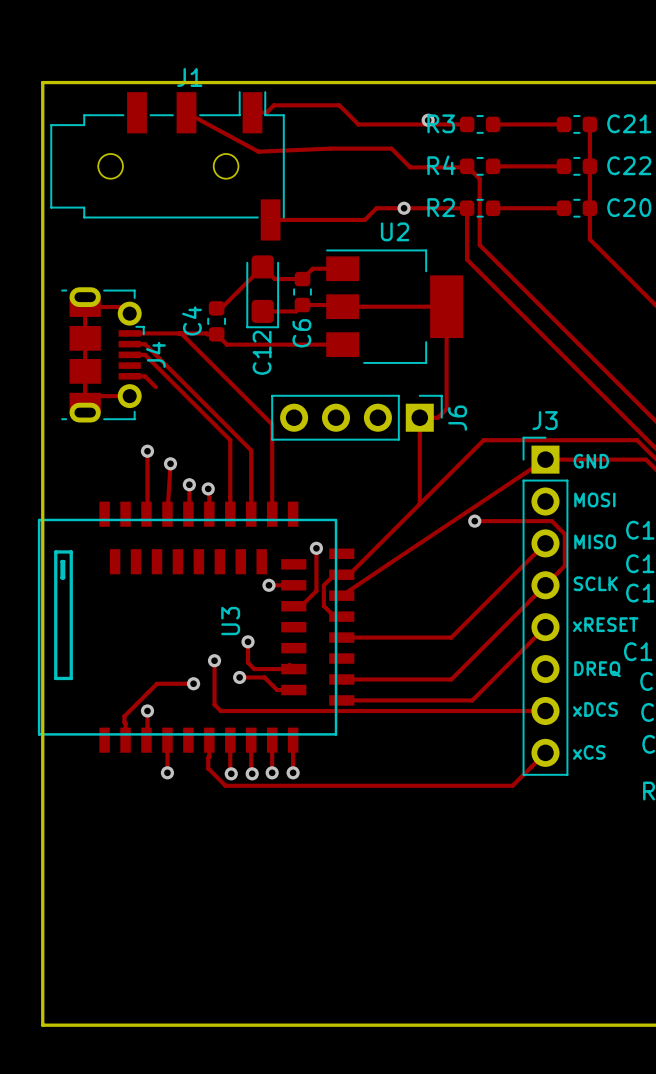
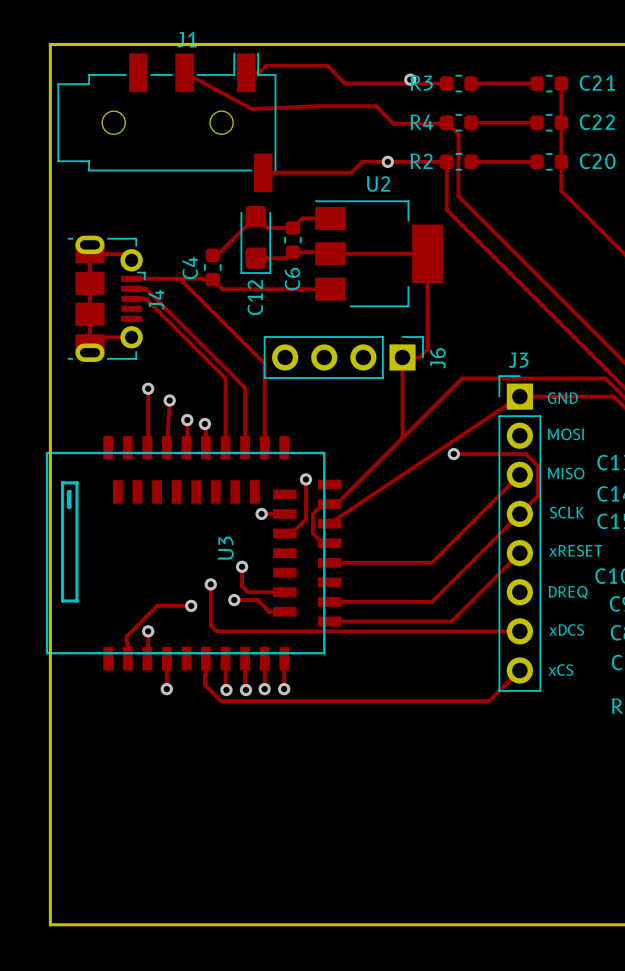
track: (129, 376) (144, 376) (155, 387) -> none

